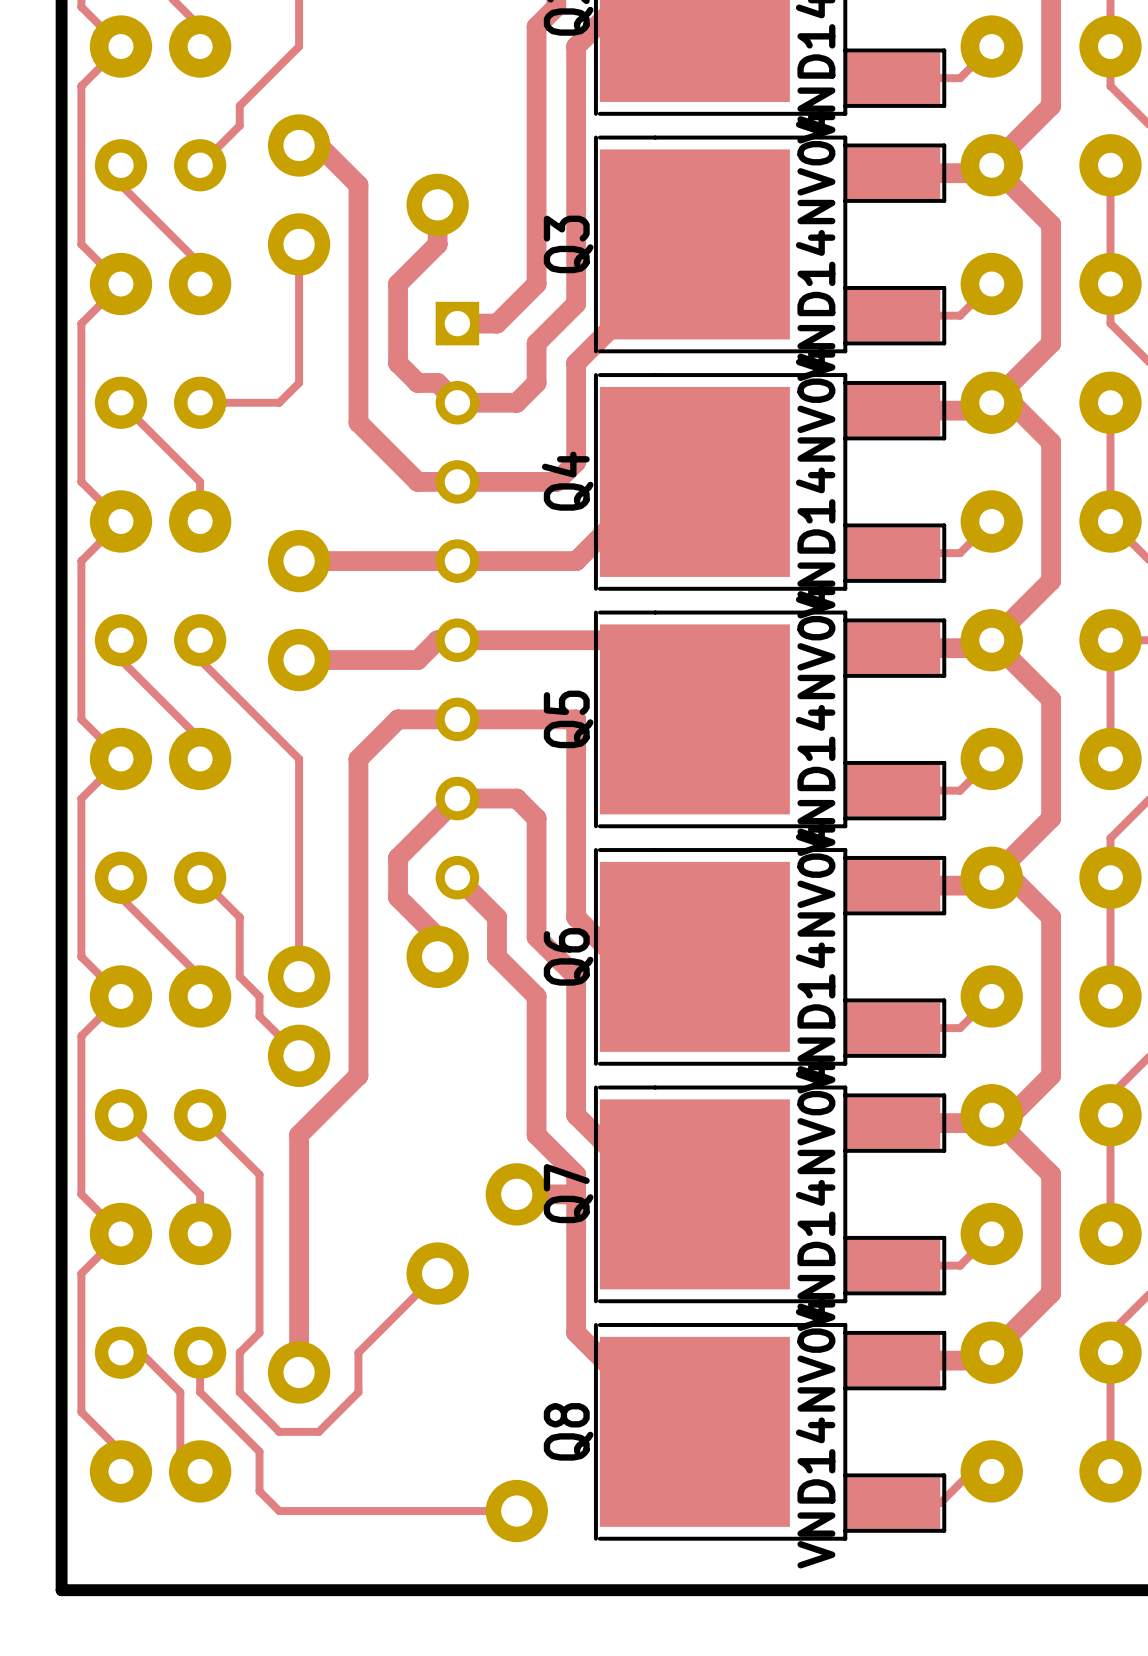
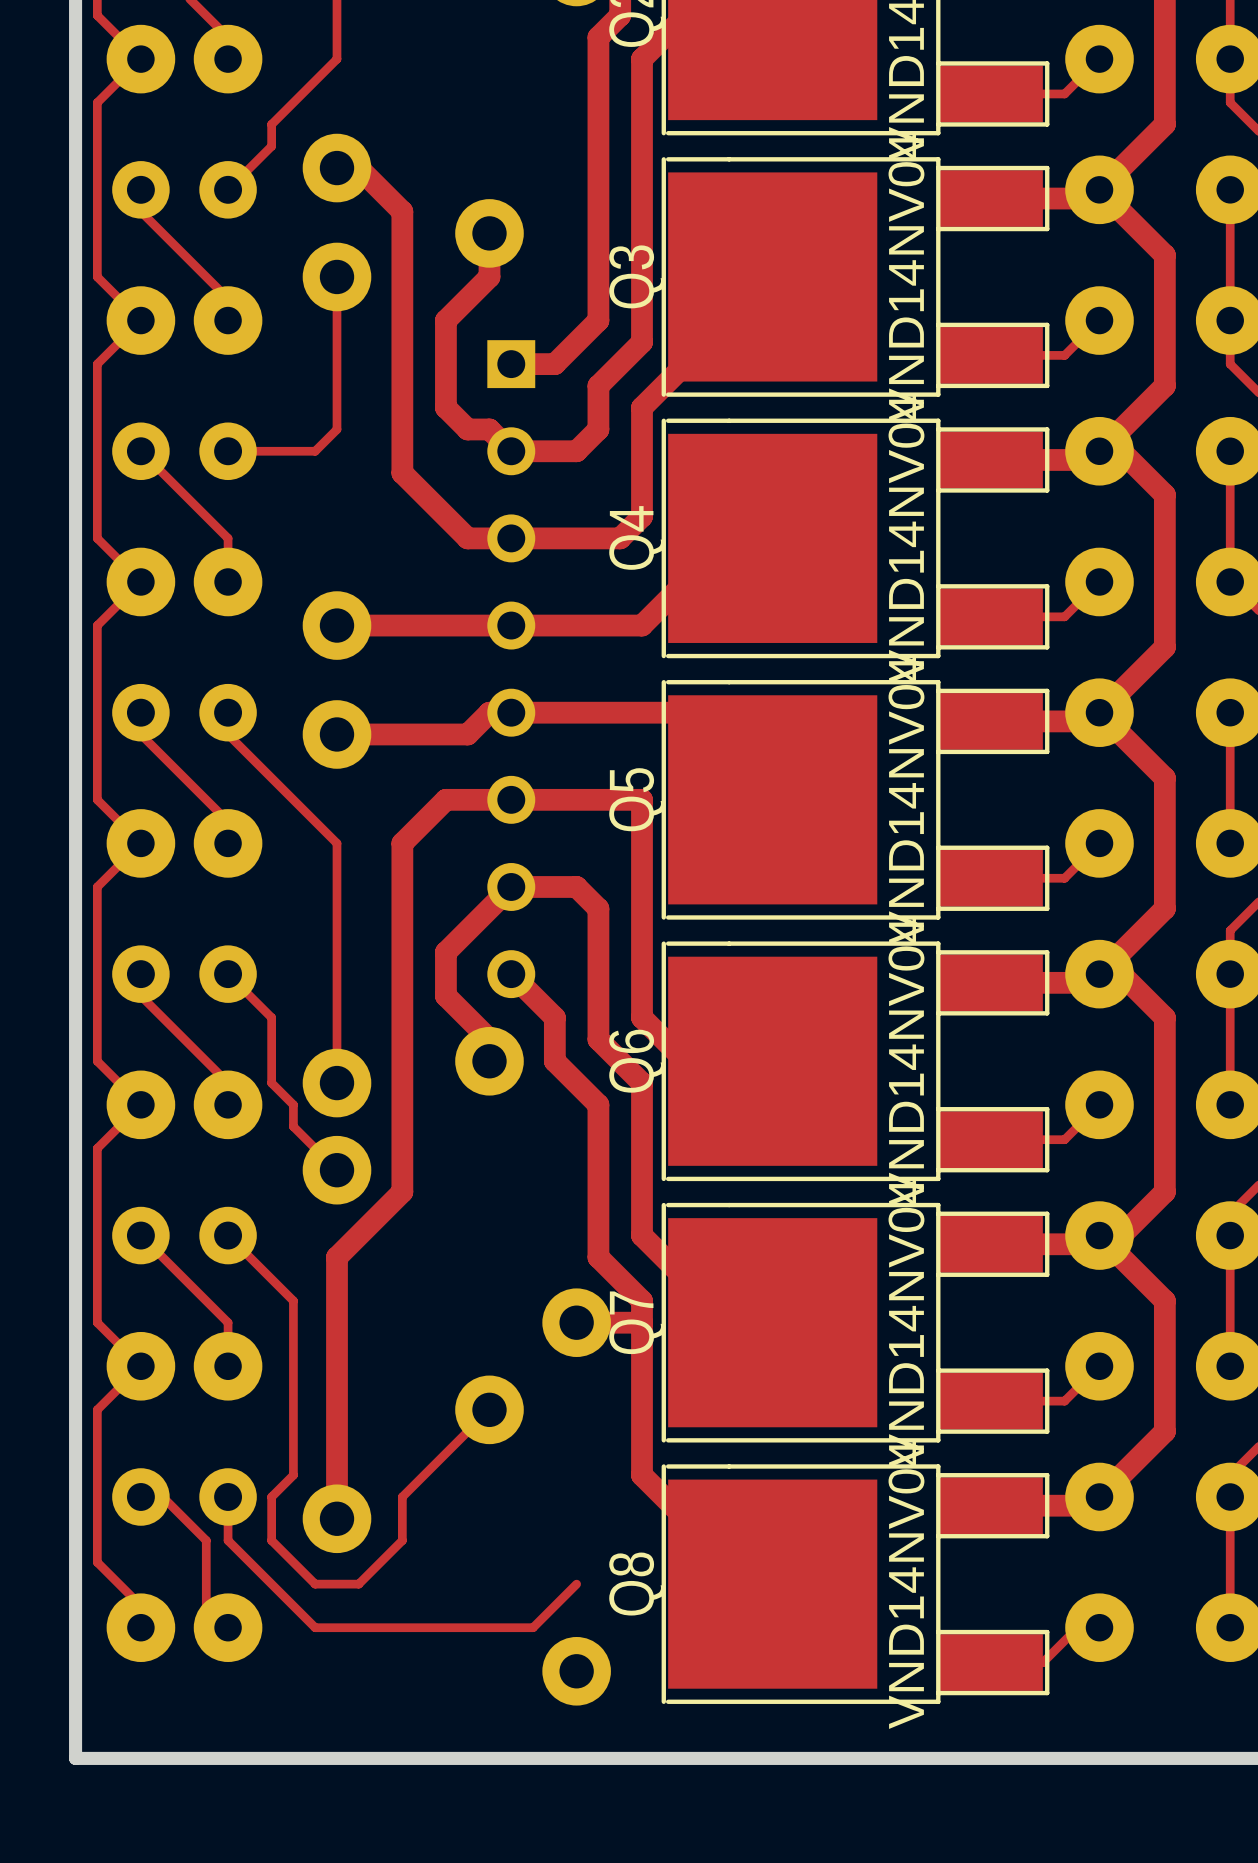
top track: (259, 1451) (259, 1491) (279, 1511) (516, 1511) -> (293, 1605) (315, 1627) (533, 1627) (576, 1584)

